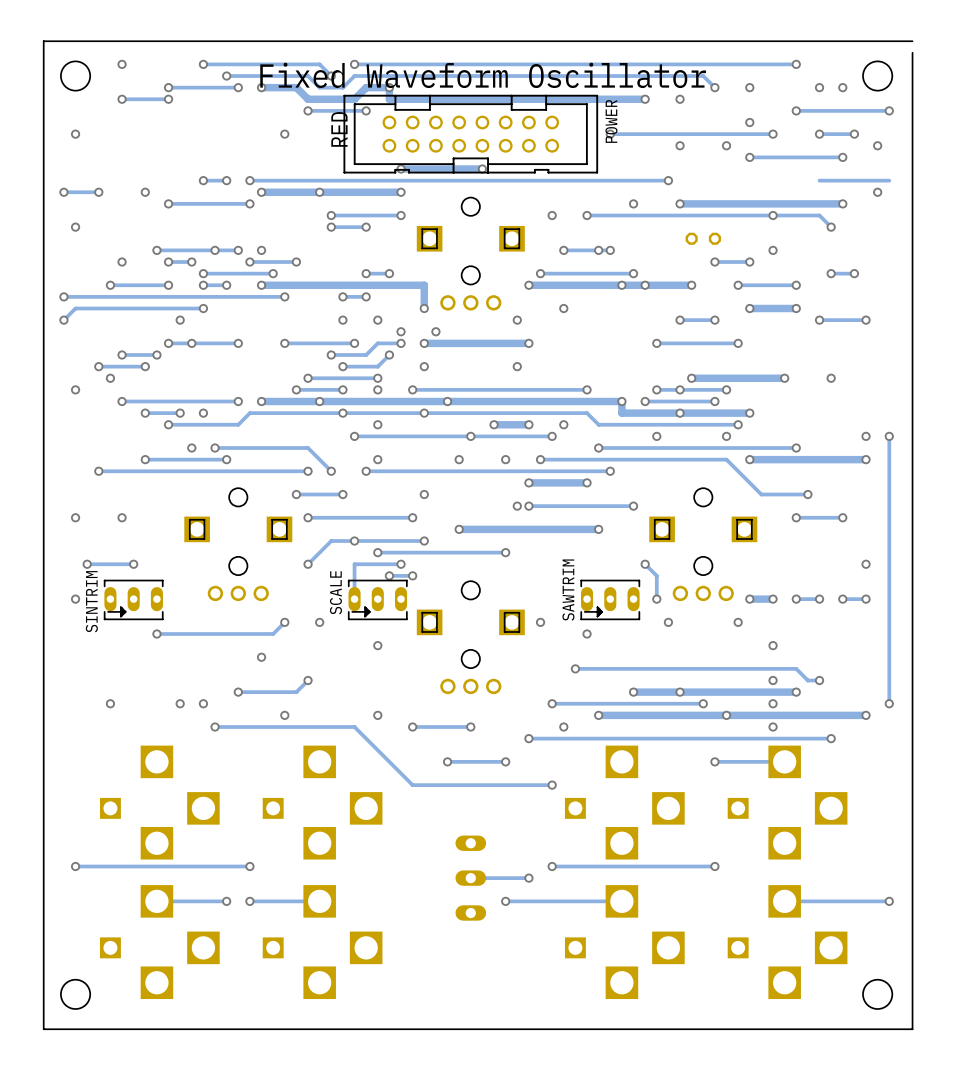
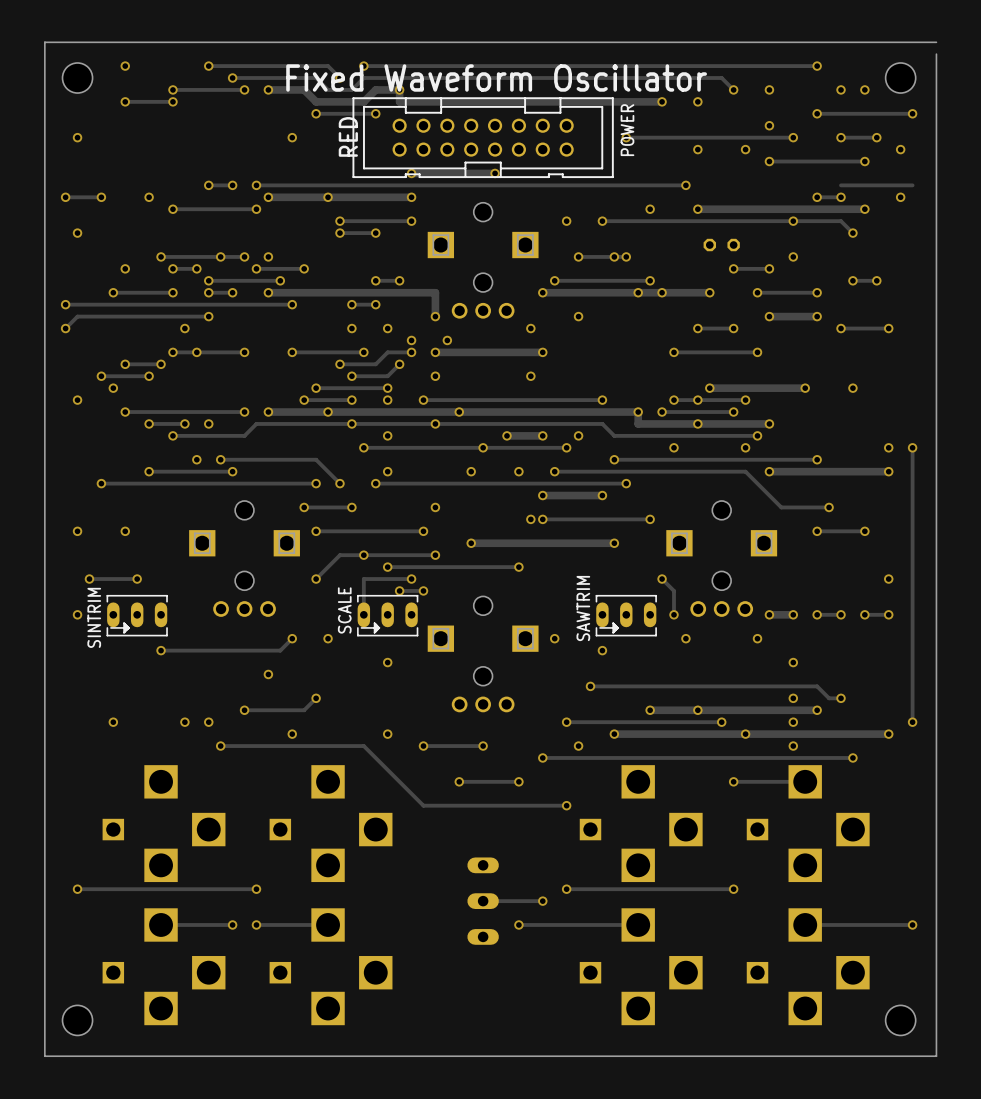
via: none -> (817, 197)
track: none -> (841, 197) (817, 197)
via: none -> (841, 197)

